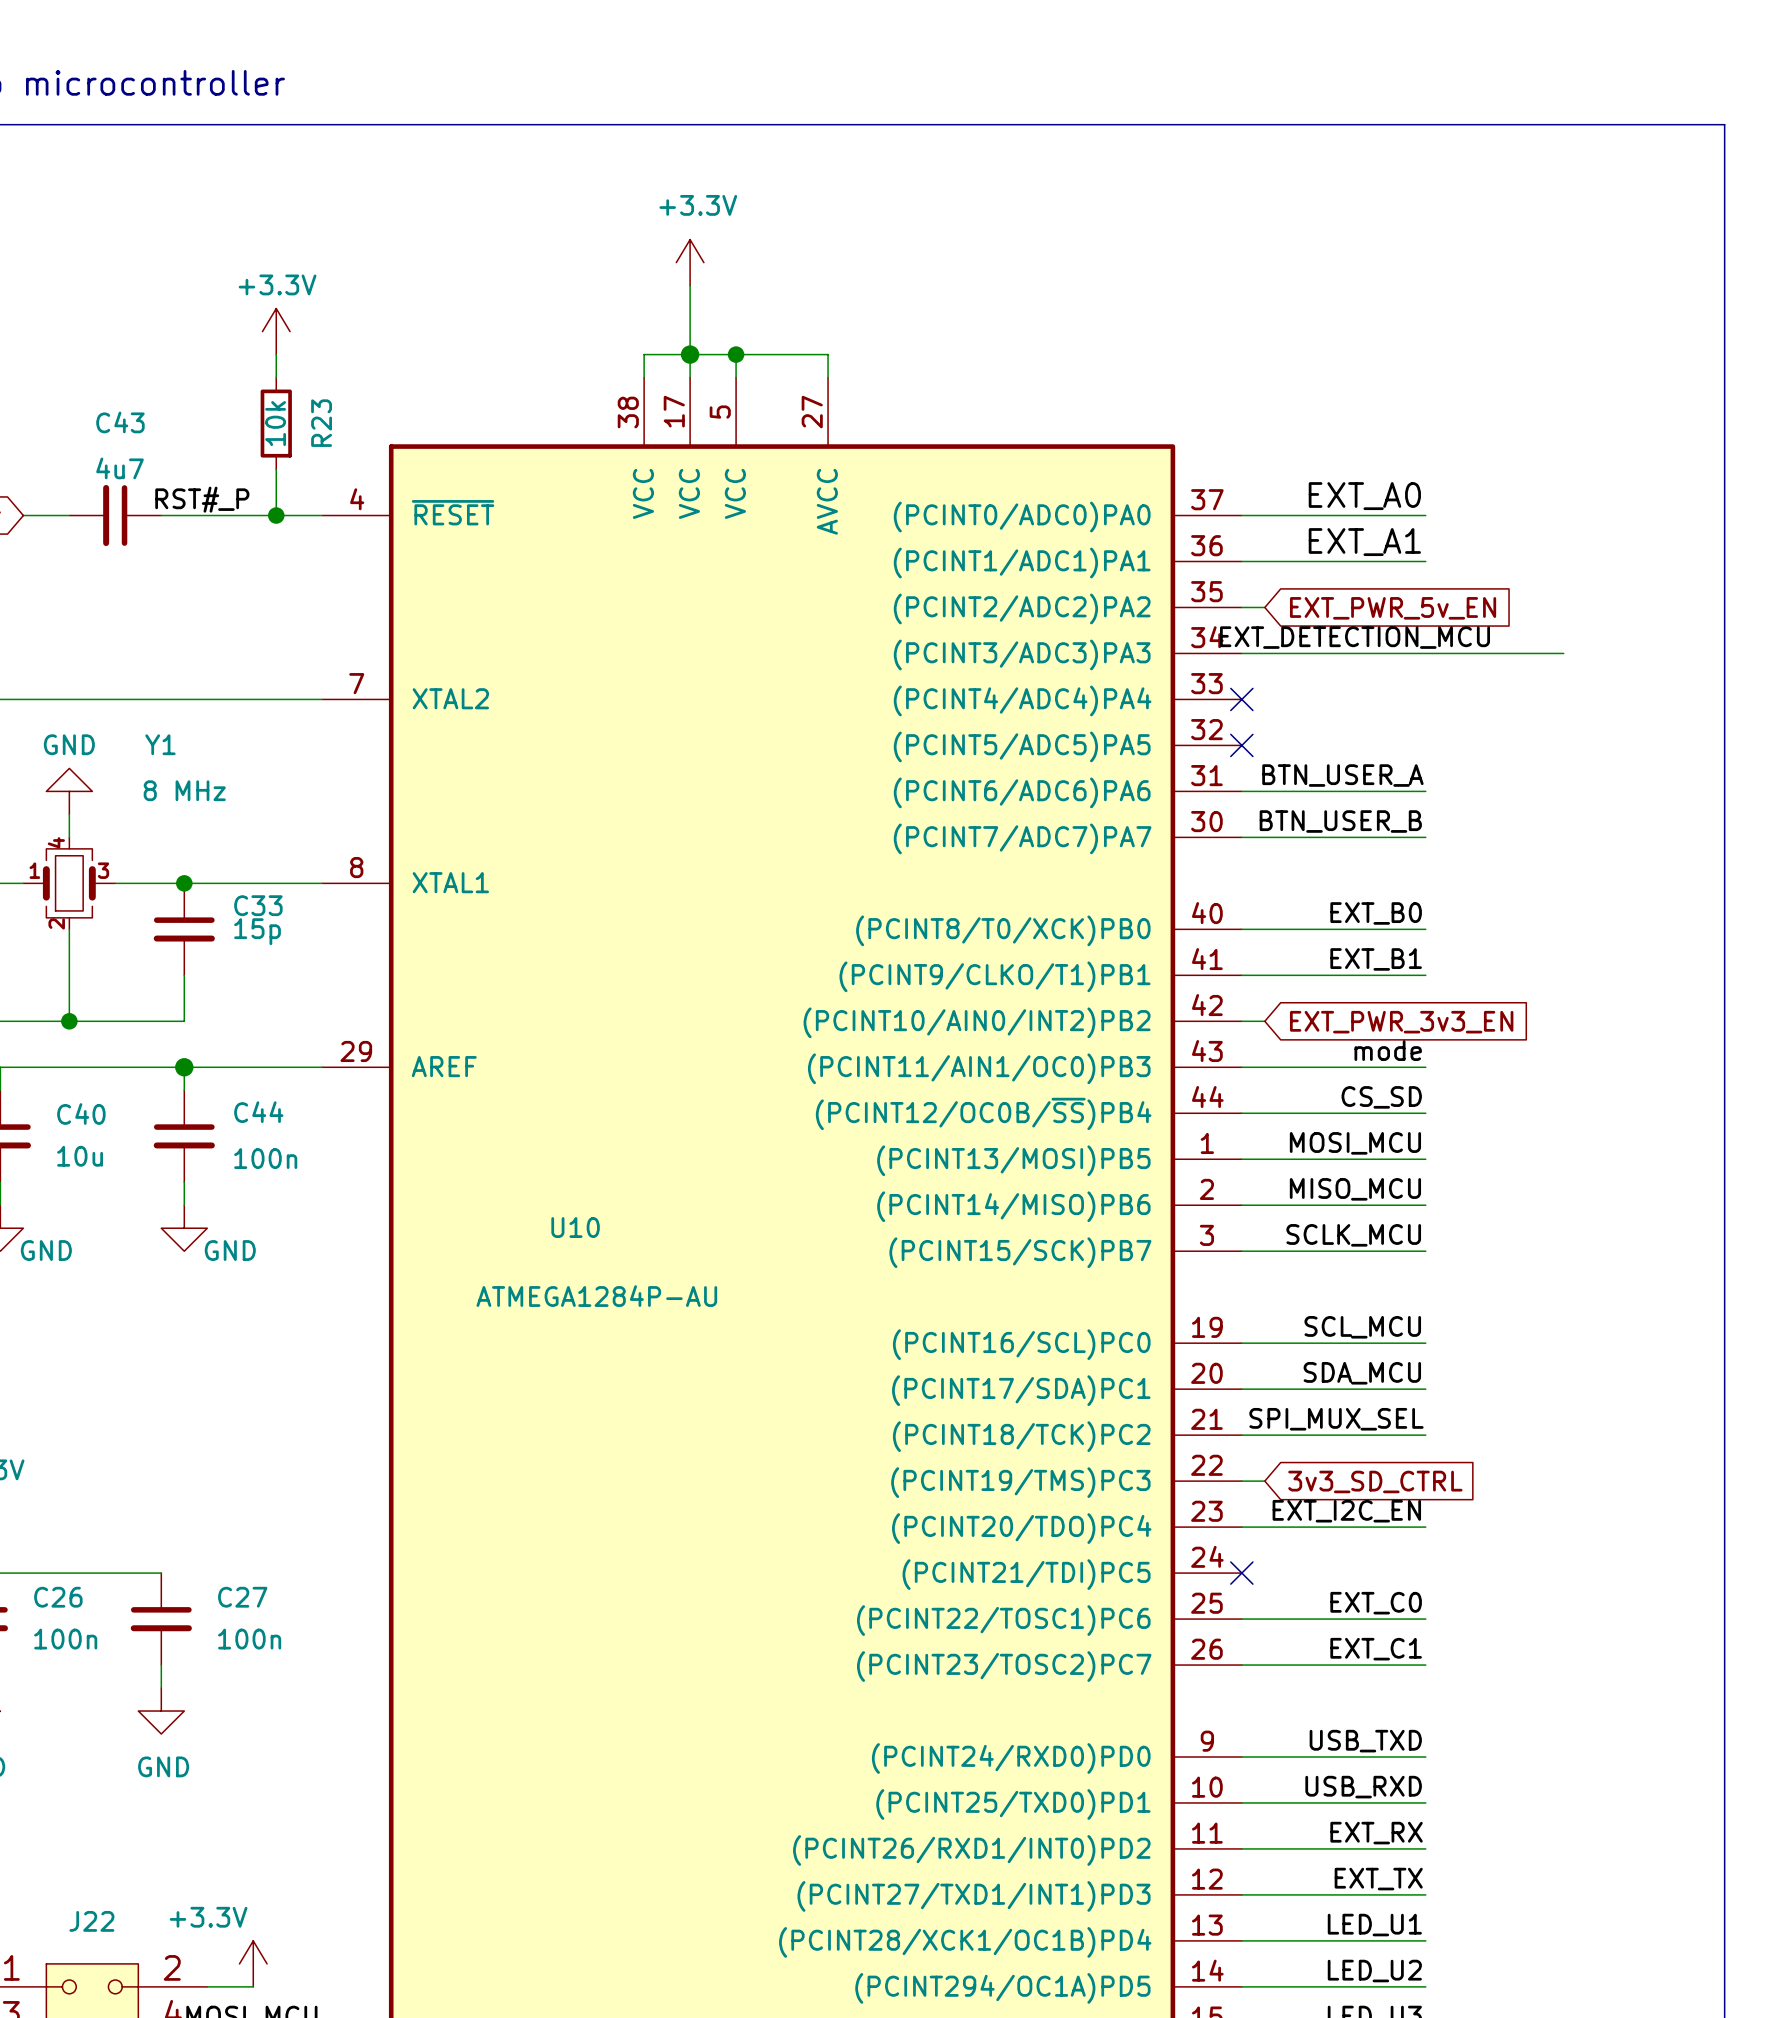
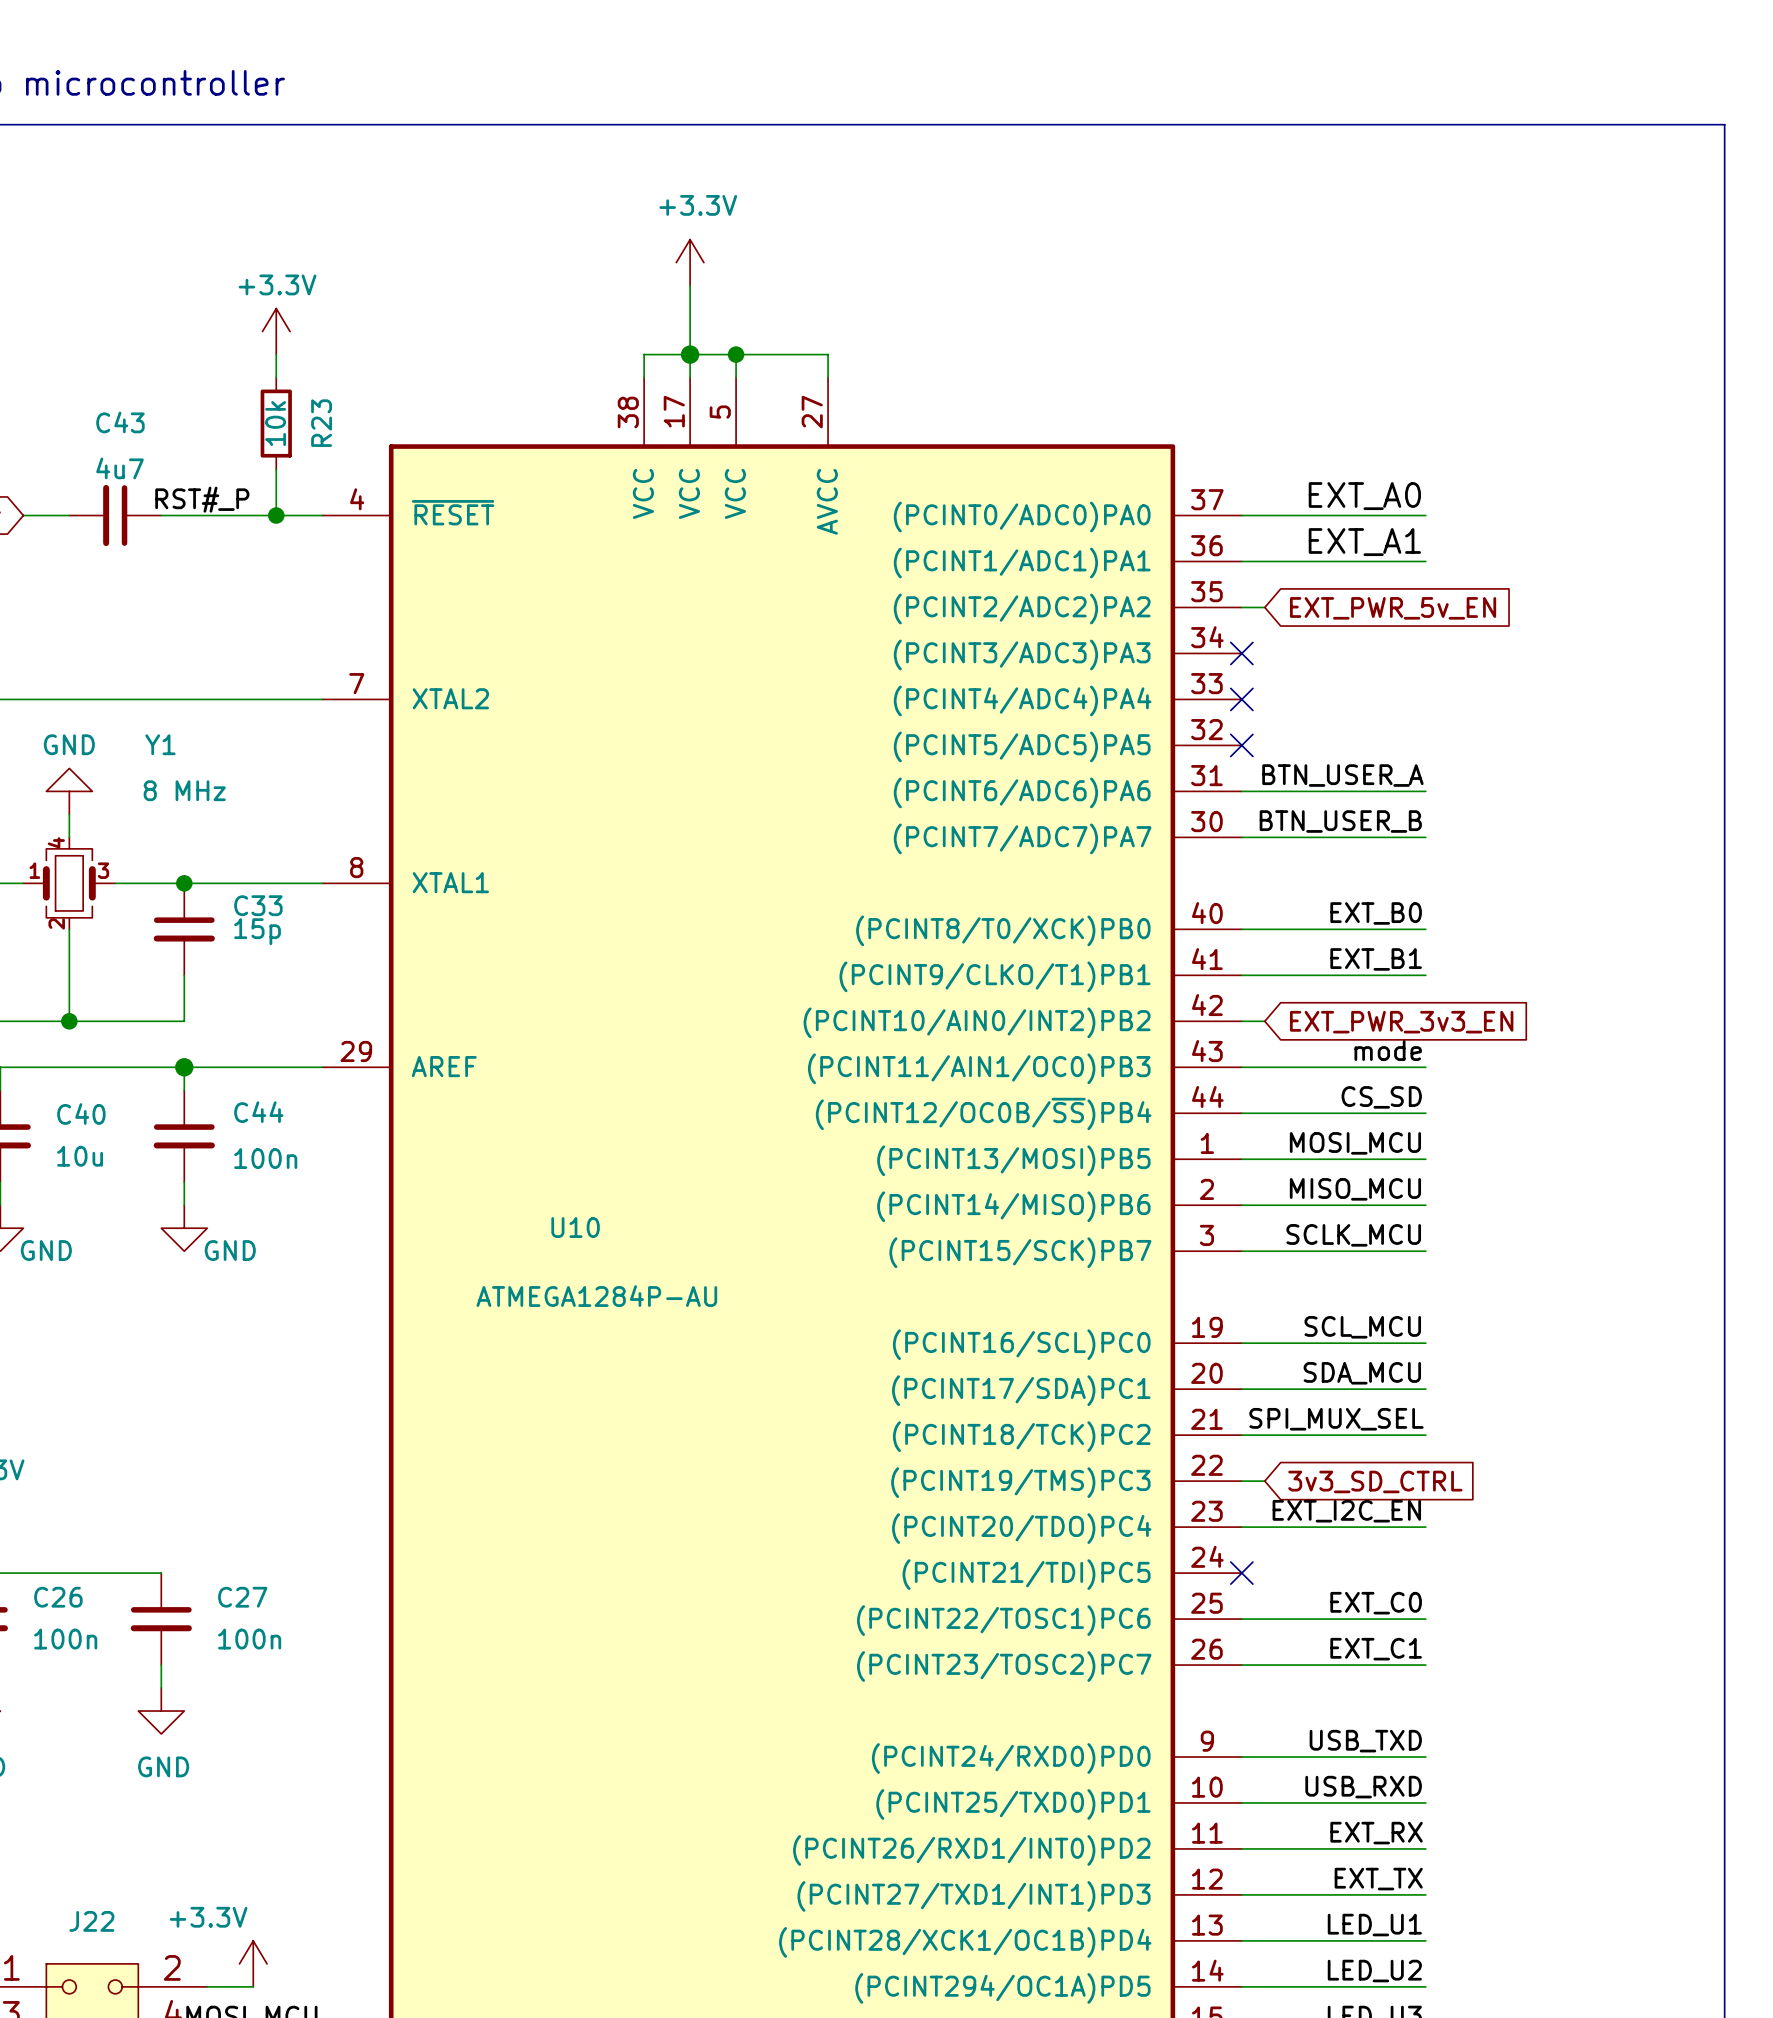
label: EXT_DETECTION_MCU (1355, 637) -> none
wire: (1241, 653) (1563, 653) -> none
no-connect mark: none -> (1241, 653)

